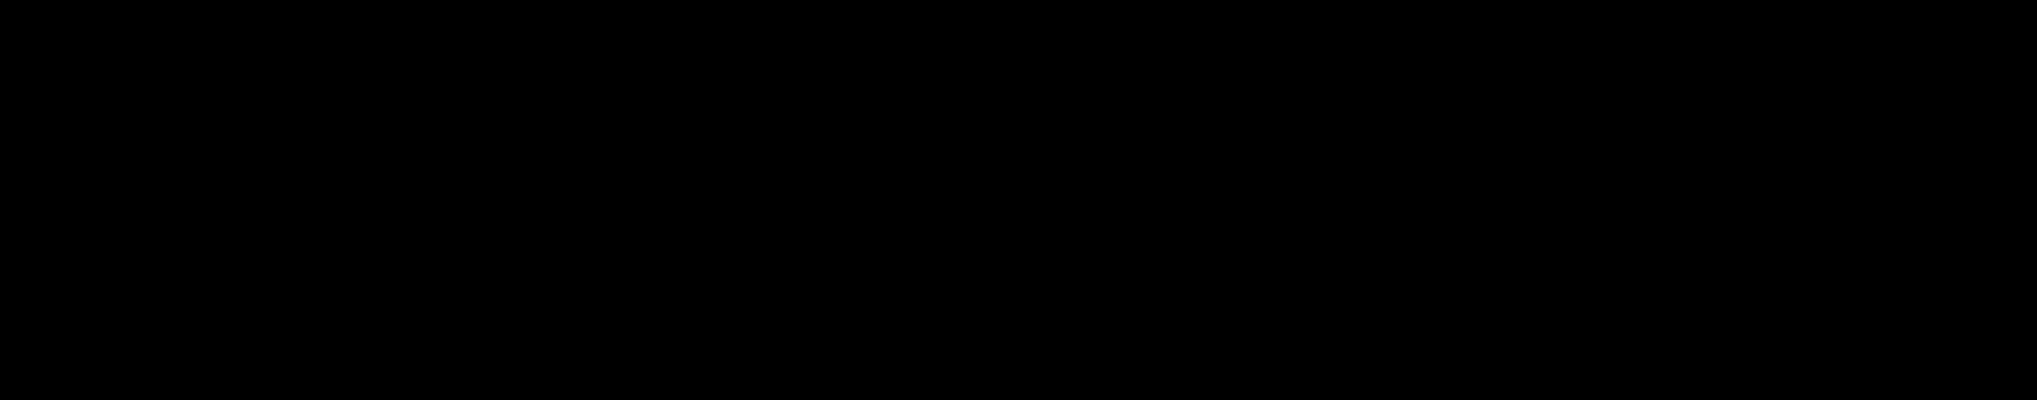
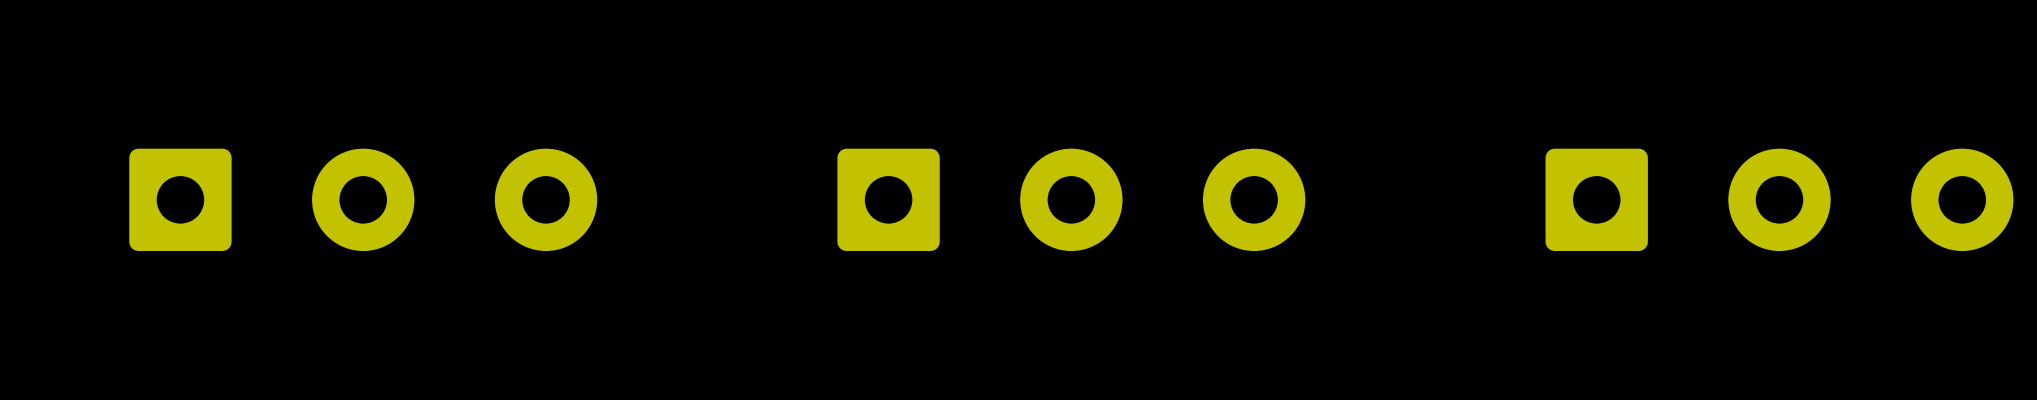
part: none -> (363, 199)
part: none -> (1071, 199)
part: none -> (1779, 199)

